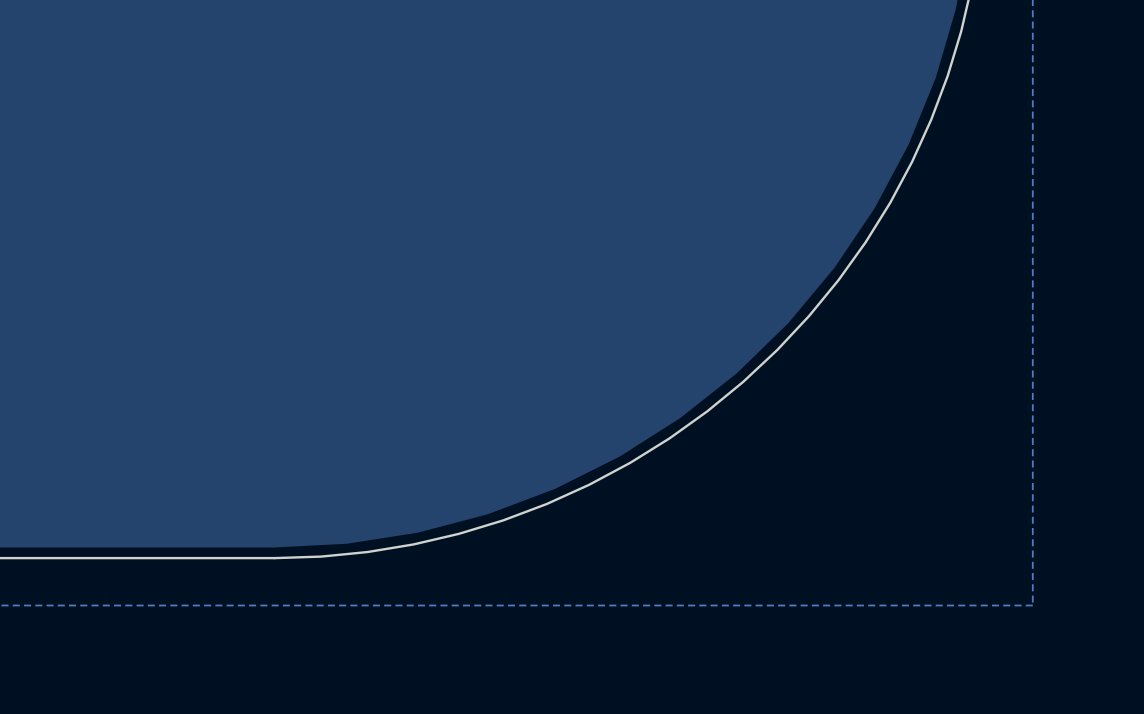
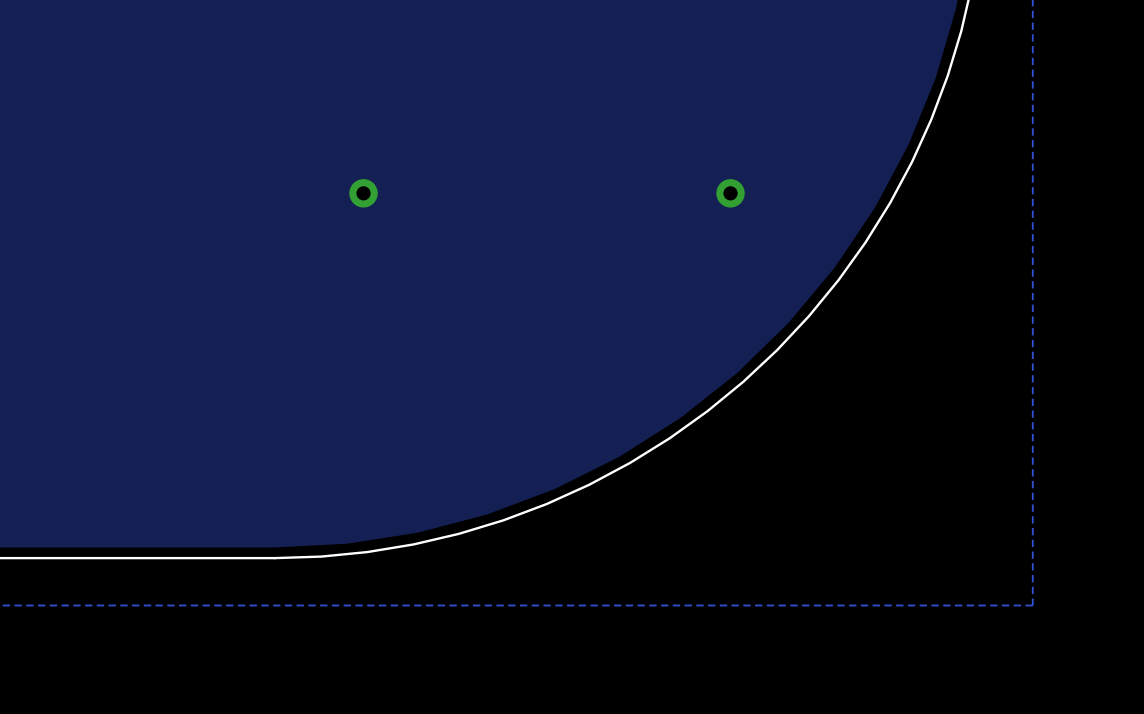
via: none -> (363, 193)
via: none -> (730, 193)

